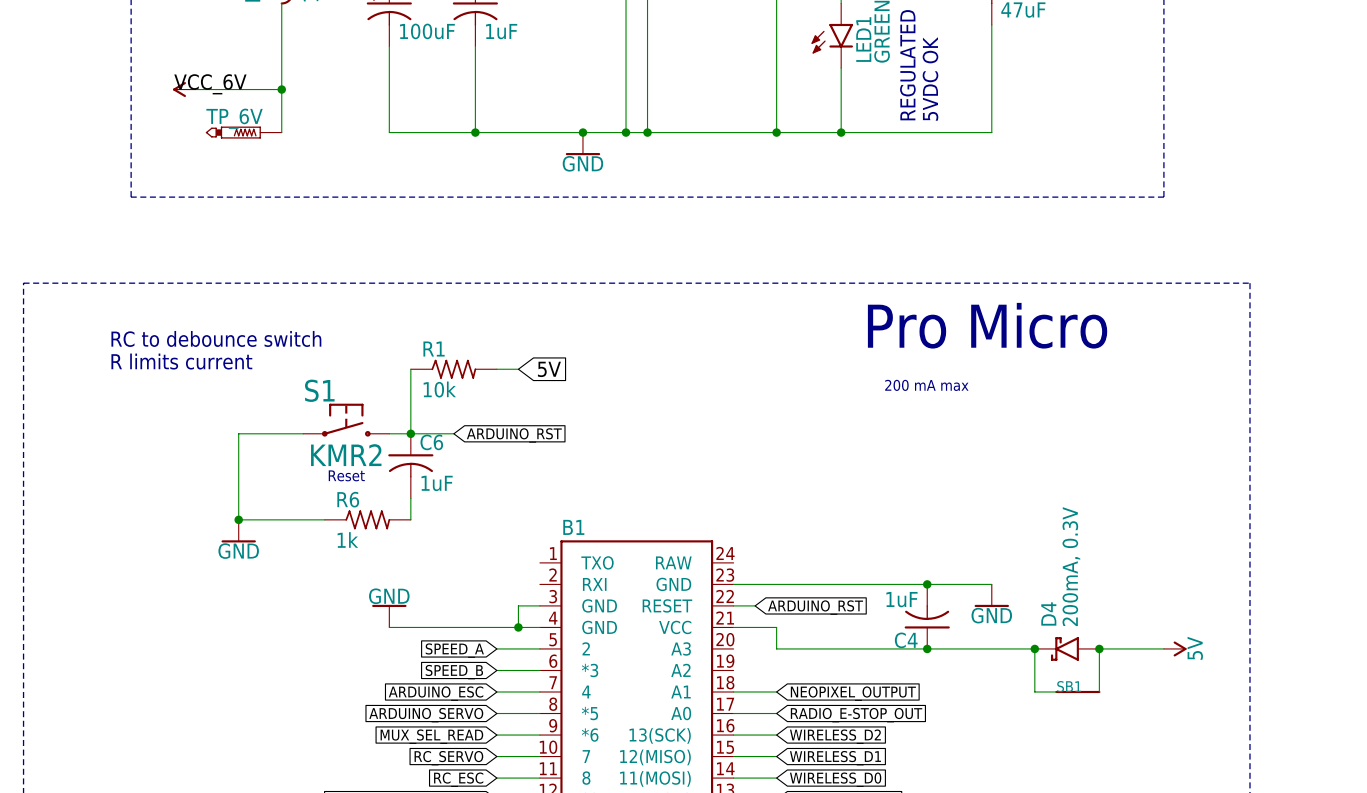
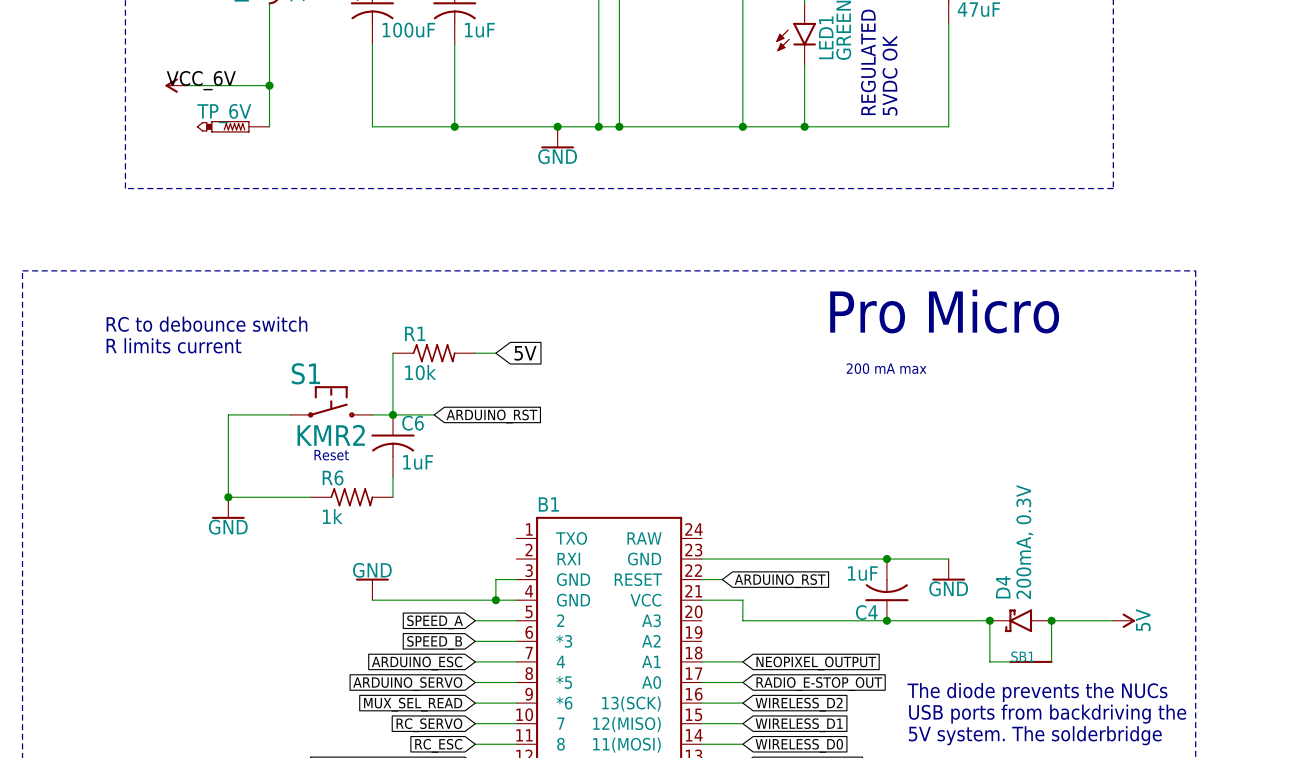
text: none -> The diode prevents the NUCs (1037, 692)
text: none -> USB ports from backdriving the (1047, 714)
text: none -> 5V system. The solderbridge (1035, 735)

